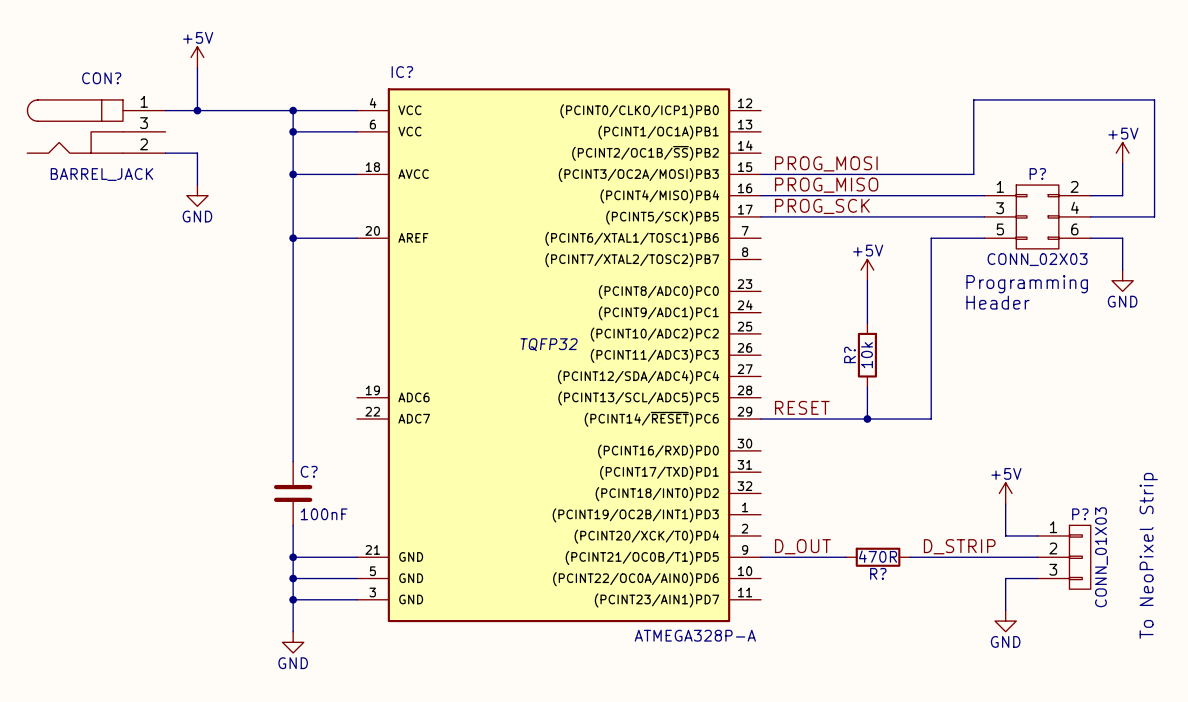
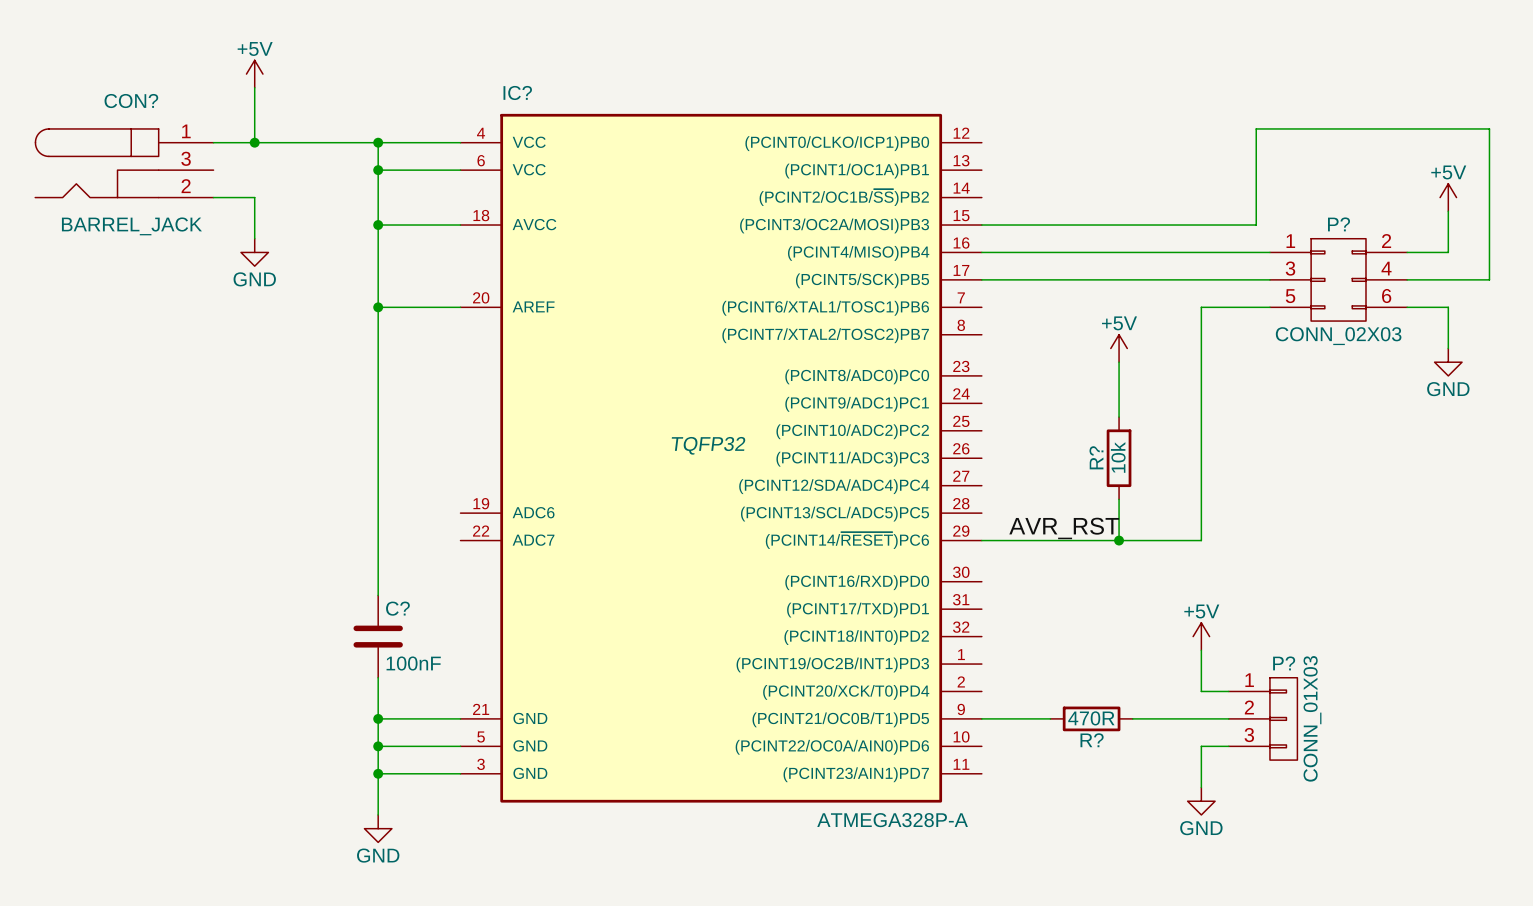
label: PROG_MOSI (826, 163) -> none
label: PROG_MISO (826, 185) -> none
label: PROG_SCK (822, 206) -> none
text: Programming (1027, 284) -> none
text: Header (997, 302) -> none
label: RESET (802, 407) -> none
label: none -> AVR_RST (1064, 528)
power symbol position: +5V (1005, 493) -> +5V (1201, 636)
wire: none -> (1201, 650) (1201, 691) (1228, 691)
wire: (1005, 504) (1005, 535) (1037, 535) -> none
label: D_OUT (802, 546) -> none
label: D_STRIP (959, 546) -> none
text: To NeoPixel Strip (1148, 555) -> none
R? position: (878, 557) -> (1091, 718)
wire: (952, 557) (1037, 557) -> none
P? position: (1064, 557) -> (1263, 718)
wire: none -> (1228, 746) (1201, 746) (1201, 787)
wire: (1037, 578) (1005, 578) (1005, 610) -> none
power symbol position: GND (1005, 621) -> GND (1201, 801)

